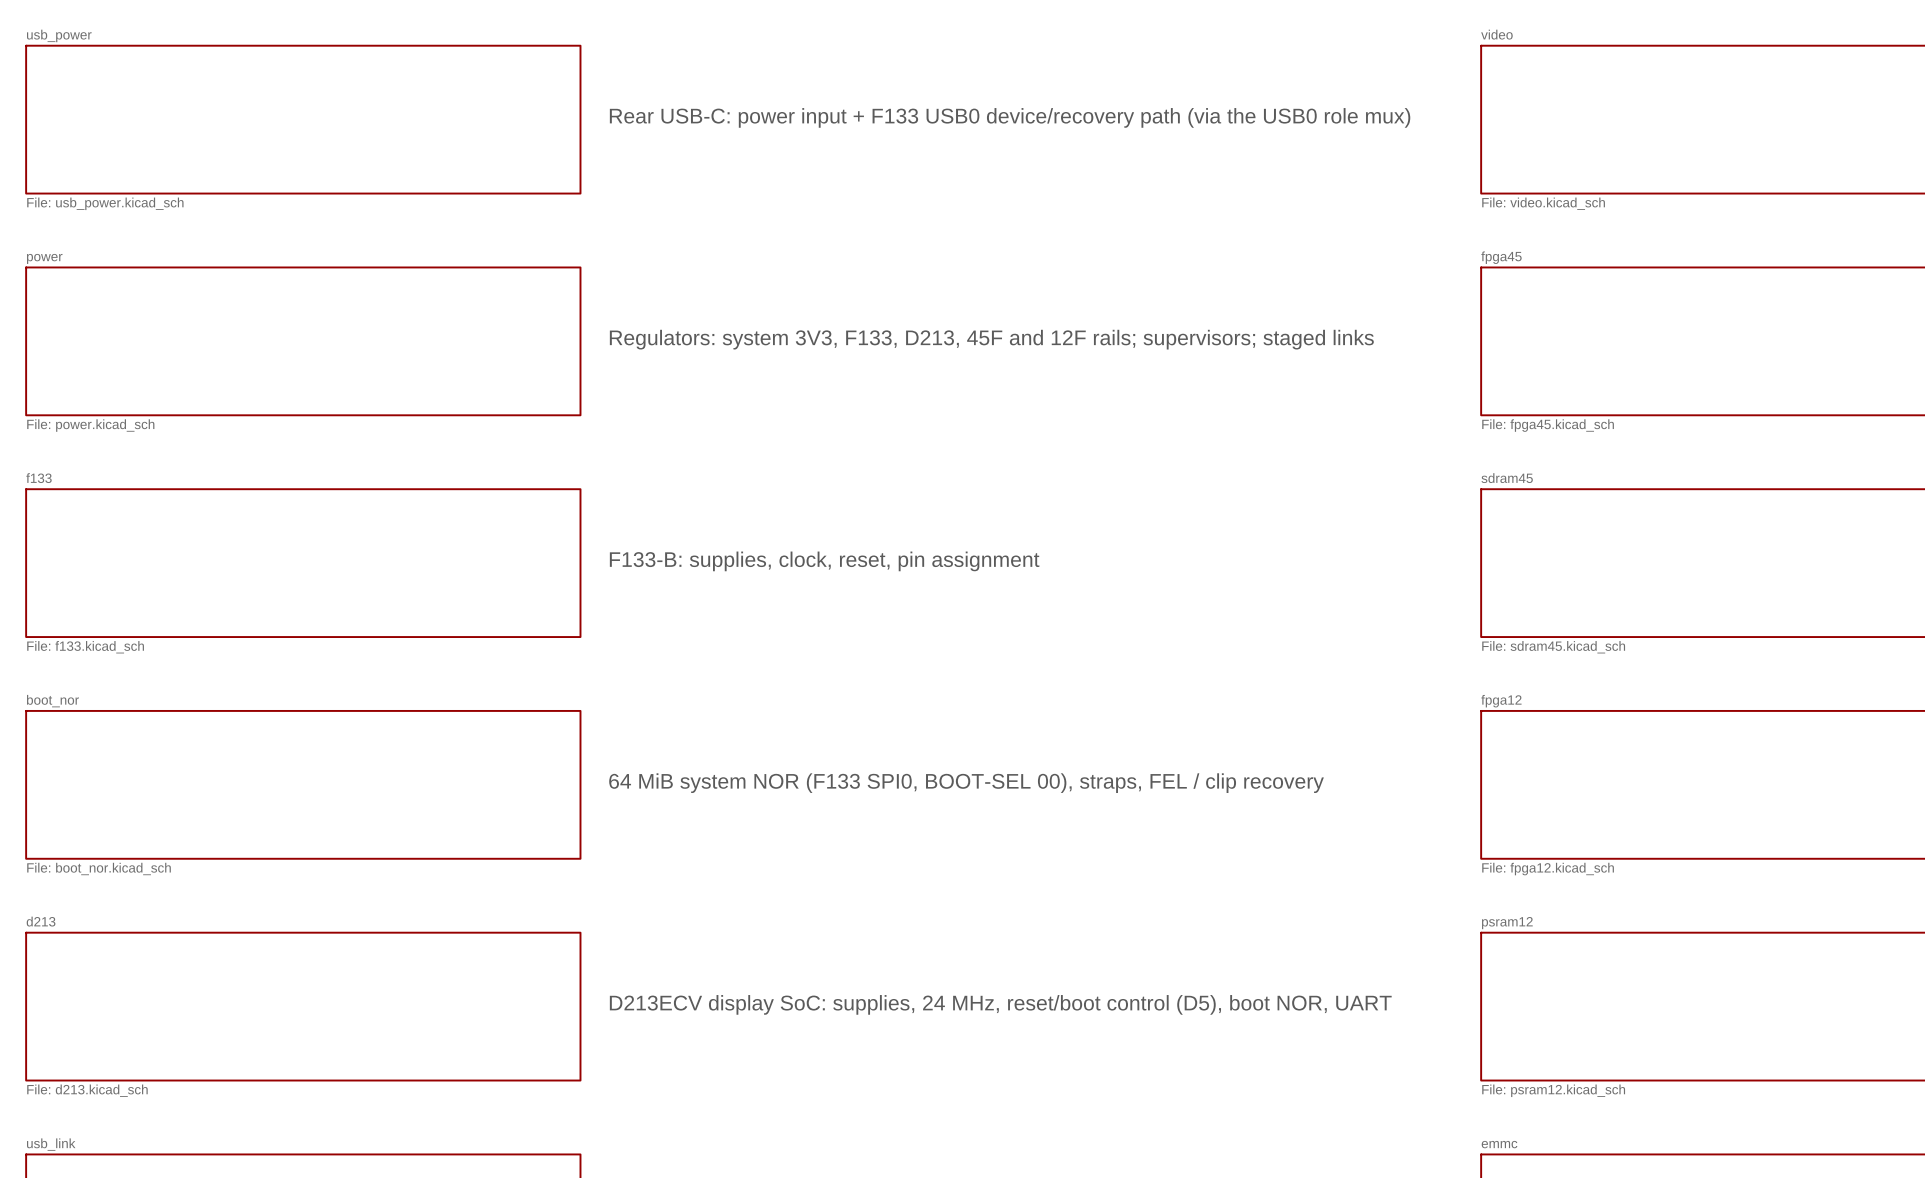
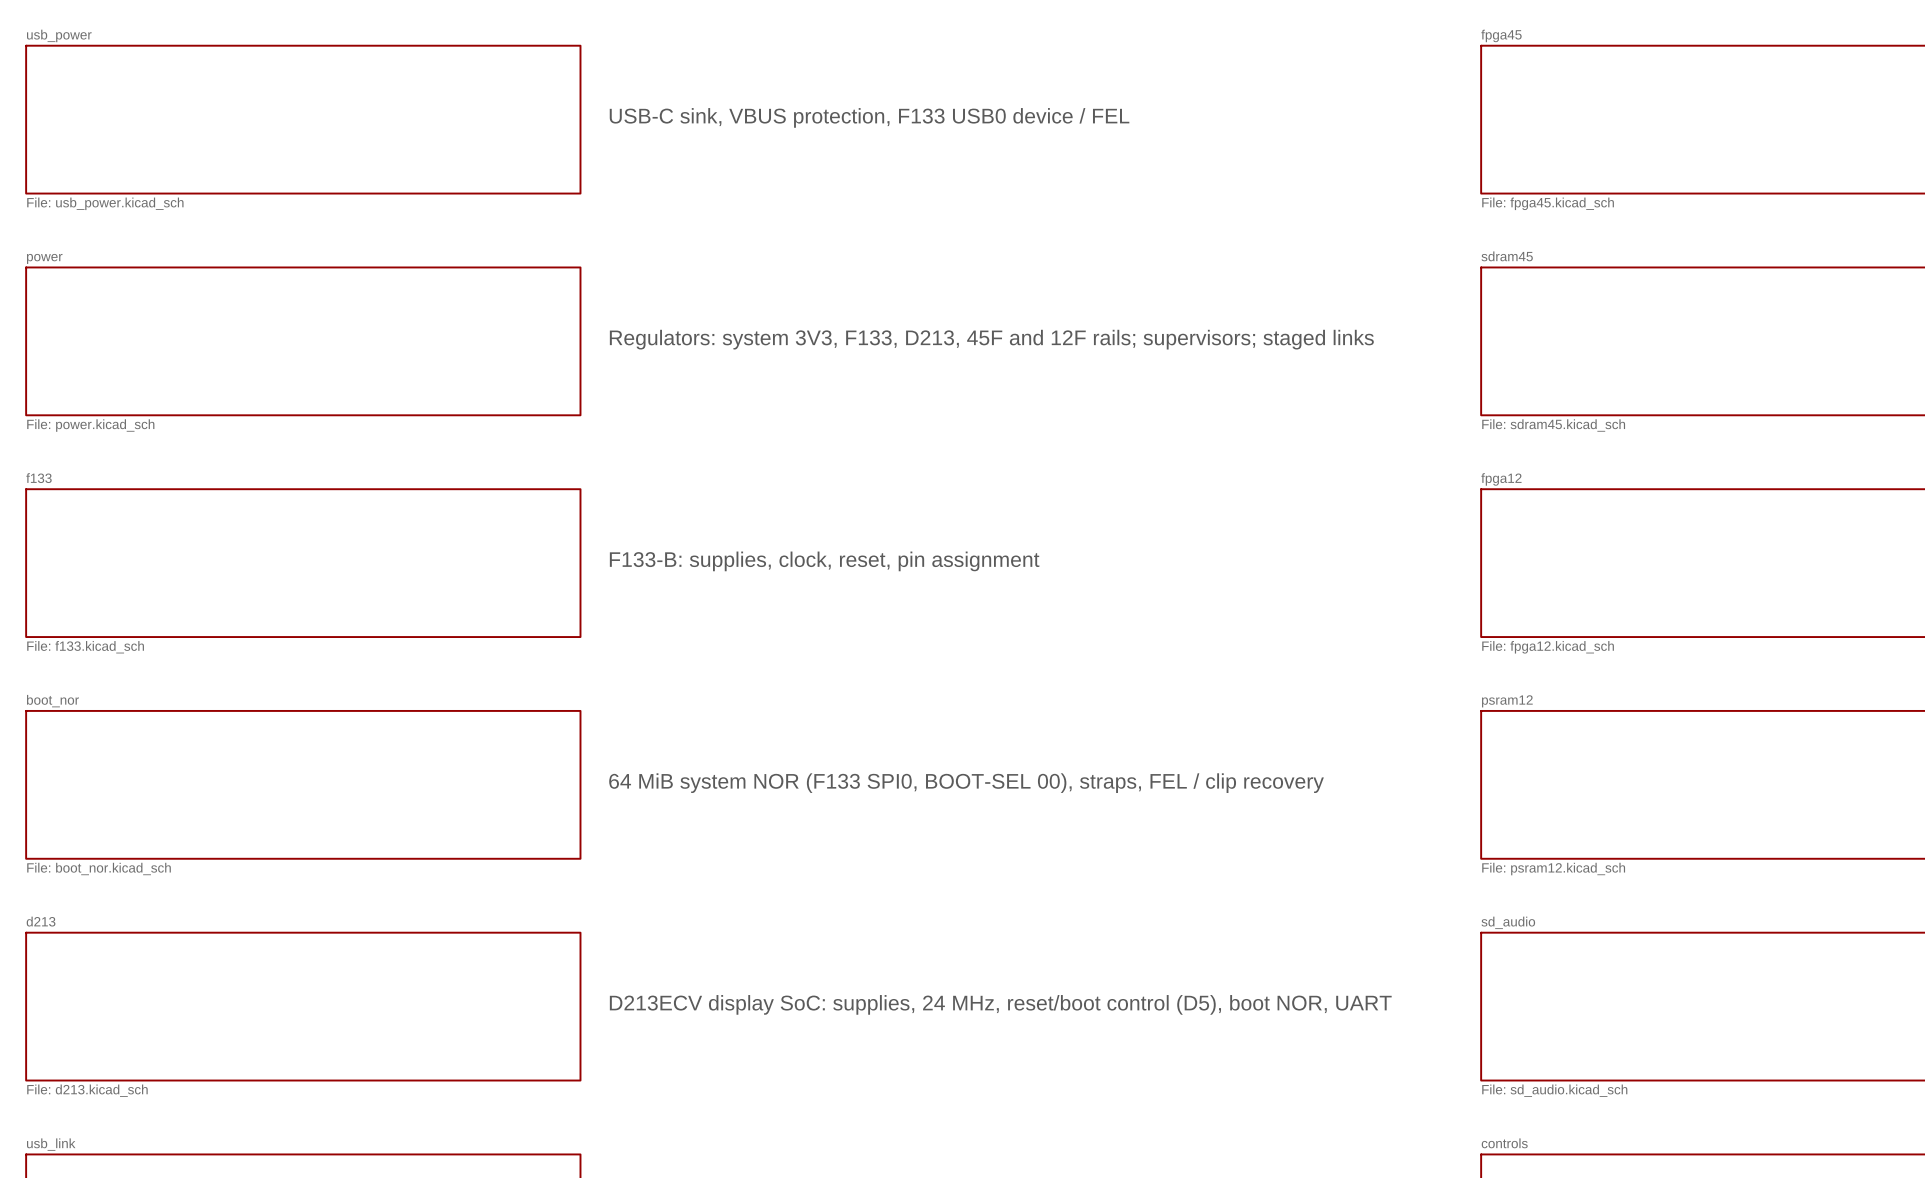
sheet video name: video (1496, 34) -> fpga45 (1501, 35)
text: Rear USB-C: power input + F133 USB0 device/recovery path (via the USB0 role mux) (1010, 117) -> USB-C sink, VBUS protection, F133 USB0 device / FEL (869, 117)
sheet video value: File: video.kicad_sch (1543, 203) -> File: fpga45.kicad_sch (1548, 203)
sheet fpga45 name: fpga45 (1501, 257) -> sdram45 (1507, 256)
sheet fpga45 value: File: fpga45.kicad_sch (1548, 425) -> File: sdram45.kicad_sch (1553, 425)
sheet sdram45 name: sdram45 (1507, 478) -> fpga12 (1501, 479)
sheet sdram45 value: File: sdram45.kicad_sch (1553, 647) -> File: fpga12.kicad_sch (1548, 647)
sheet fpga12 name: fpga12 (1501, 701) -> psram12 (1507, 701)
sheet fpga12 value: File: fpga12.kicad_sch (1548, 869) -> File: psram12.kicad_sch (1553, 869)
sheet psram12 name: psram12 (1507, 923) -> sd_audio (1508, 922)
sheet psram12 value: File: psram12.kicad_sch (1553, 1090) -> File: sd_audio.kicad_sch (1554, 1090)
sheet emmc name: emmc (1499, 1144) -> controls (1504, 1143)

